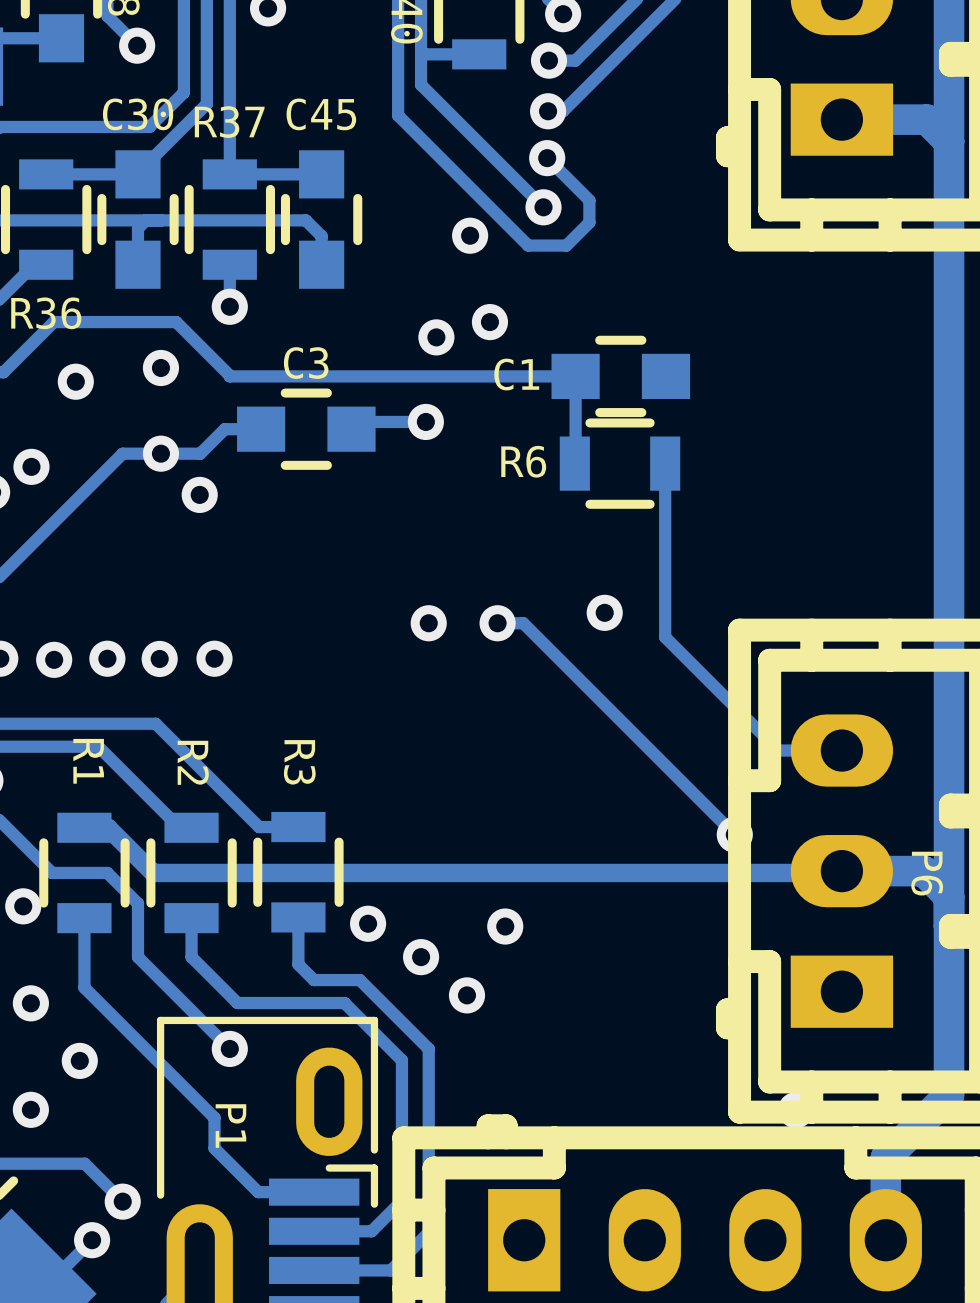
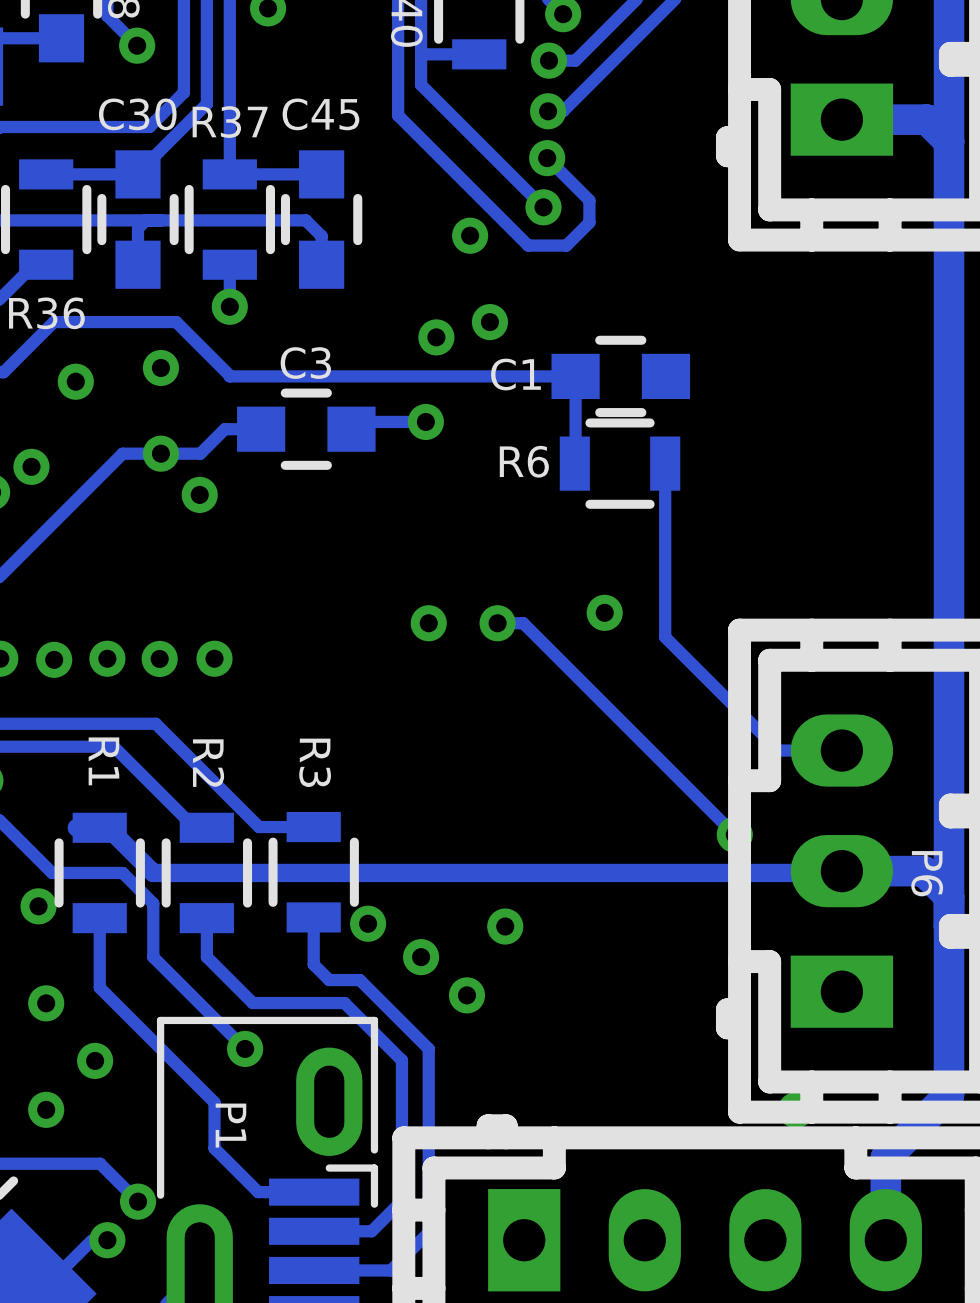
track: (98, 746) (179, 827) (191, 827) -> (98, 746) (113, 746) (194, 827) (206, 827)
R1 position: (84, 872) -> (99, 872)
track: (107, 872) (138, 903) (138, 957) (229, 1048) -> (107, 872) (122, 872) (153, 903) (153, 957) (245, 1048)
R2 position: (191, 872) -> (206, 872)
R3 position: (298, 872) -> (313, 872)
via position: (23, 906) -> (38, 906)
track: (298, 917) (298, 964) (313, 980) (329, 980) -> (313, 917) (313, 964) (329, 980)
track: (84, 918) (84, 987) (214, 1117) -> (99, 918) (99, 987) (214, 1102) (214, 1117)
track: (191, 918) (191, 957) (237, 1003) (252, 1003) -> (206, 918) (206, 957) (252, 1003)
via position: (30, 1003) -> (46, 1003)
via position: (229, 1048) -> (245, 1048)
via position: (79, 1060) -> (95, 1060)
via position: (30, 1109) -> (46, 1109)
track: (84, 1163) (122, 1201) -> (84, 1163) (100, 1163) (138, 1201)
via position: (122, 1201) -> (138, 1201)
via position: (92, 1240) -> (107, 1240)

